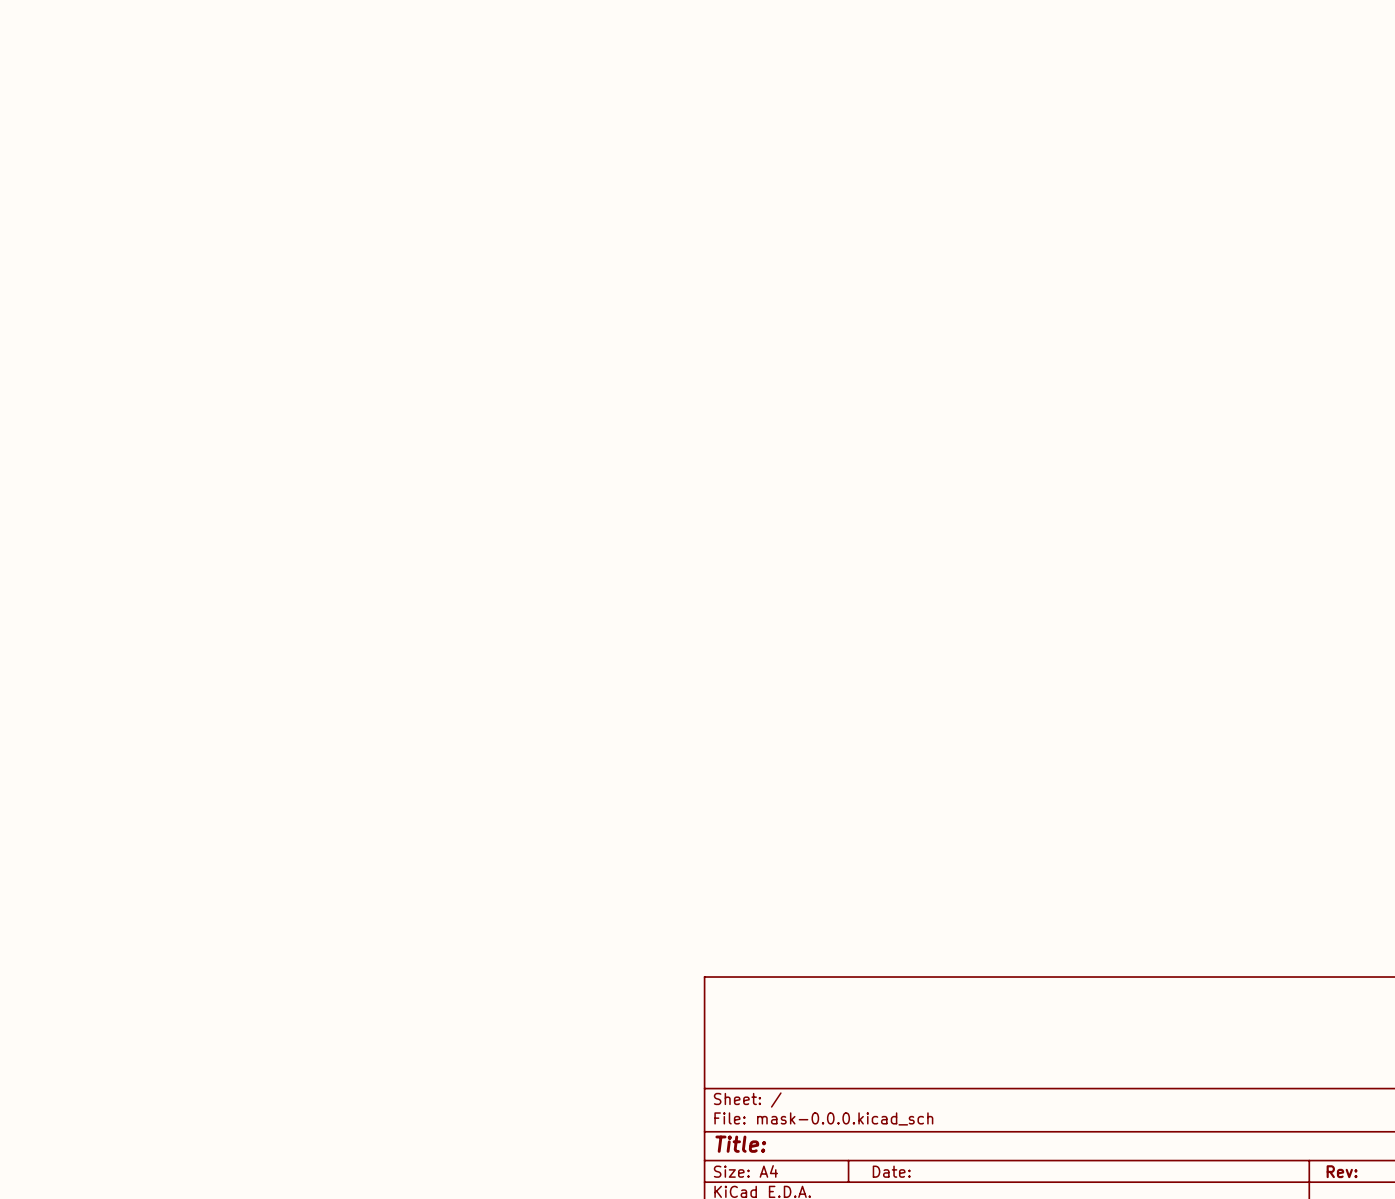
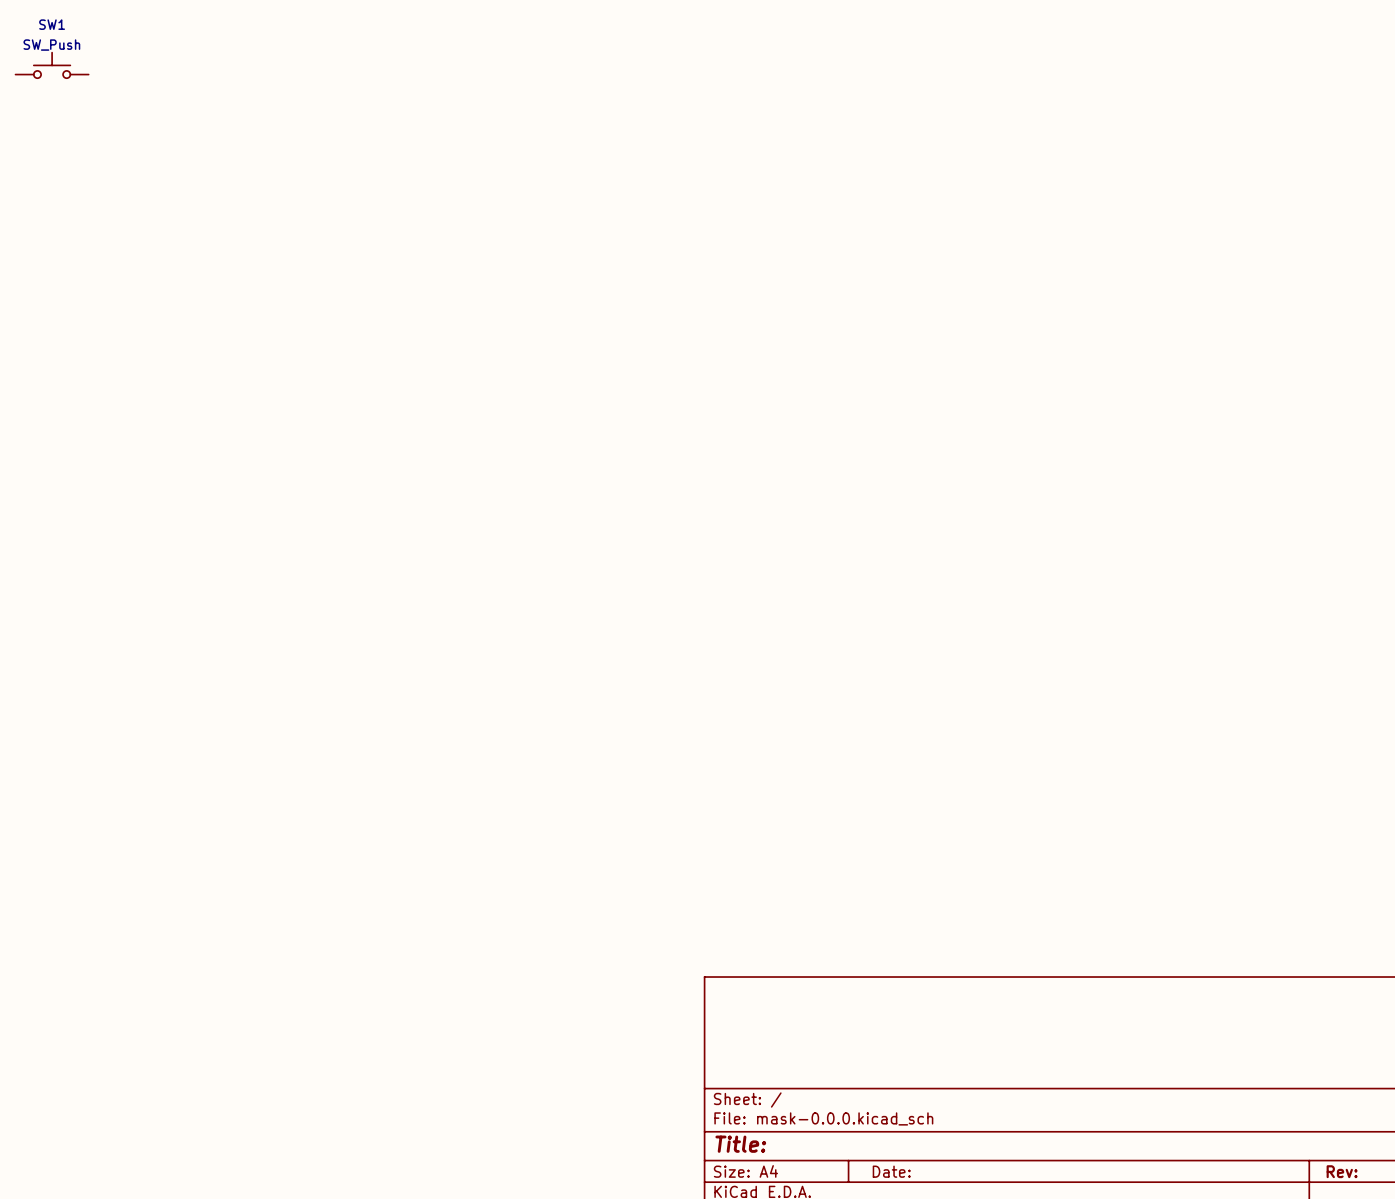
SW1: none -> SW_Push (52, 65)

